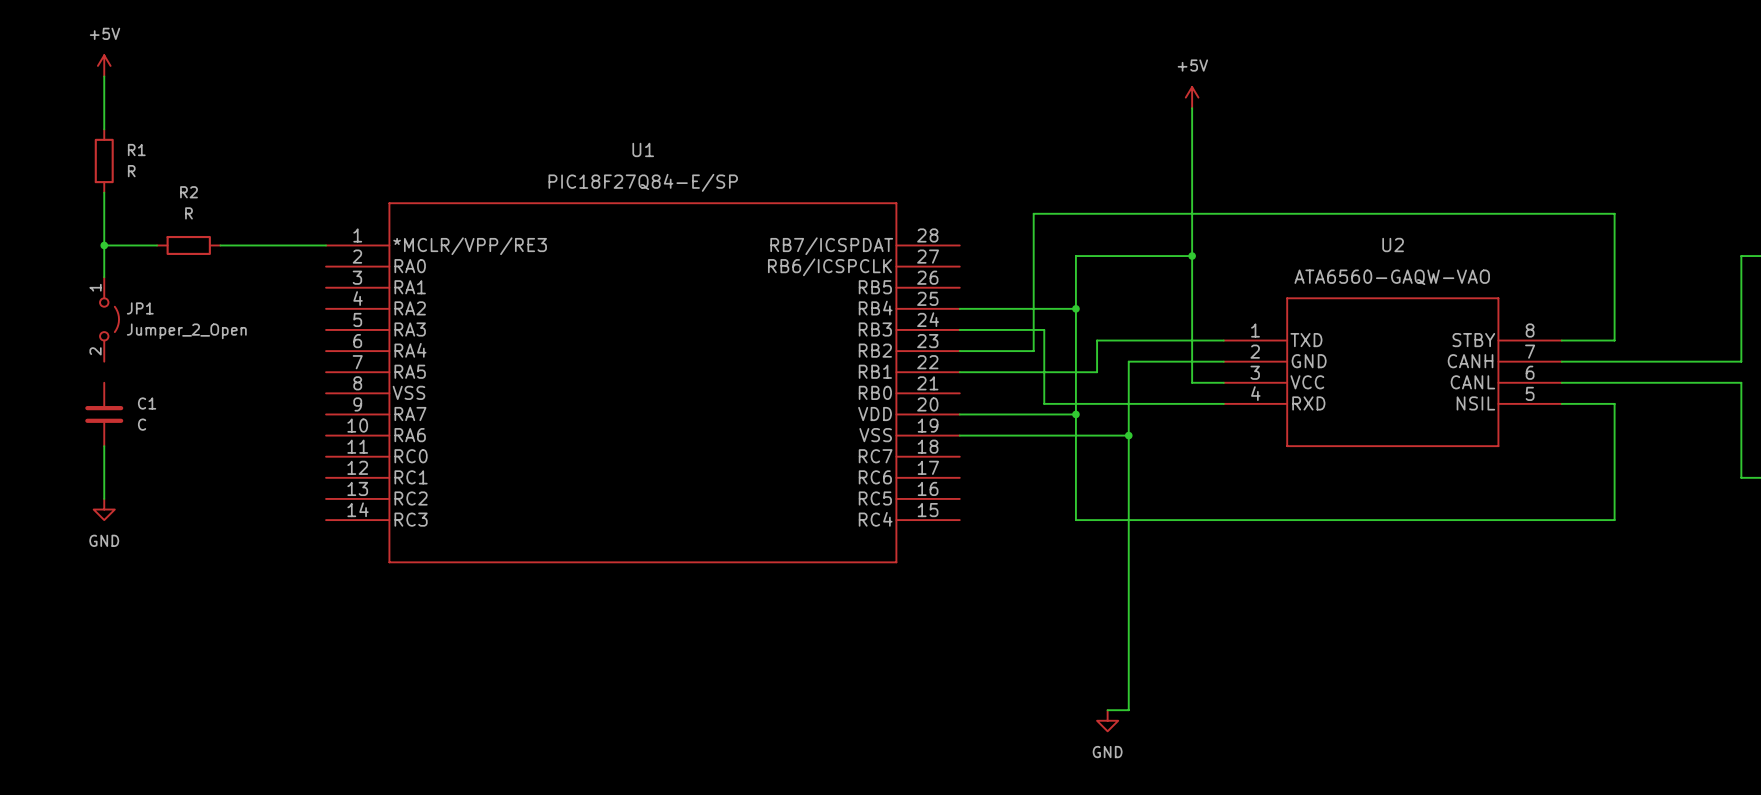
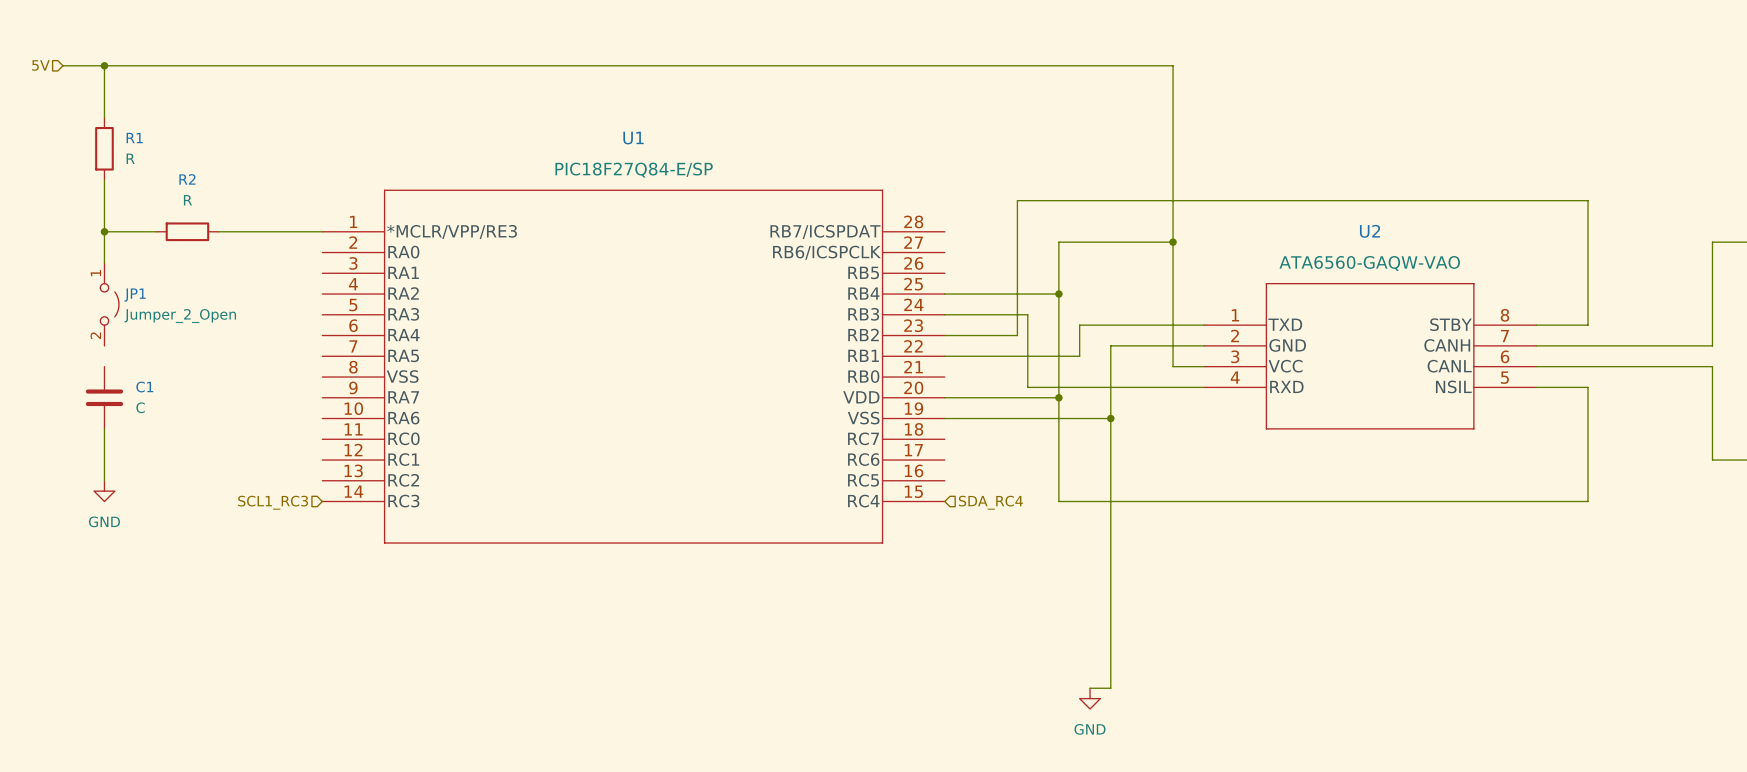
power symbol: +5V (104, 65) -> none
hierarchical label: none -> 5V (40, 65)
wire: none -> (62, 65) (1173, 65) (1173, 96)
junction: none -> (104, 65)
power symbol: +5V (1192, 97) -> none
hierarchical label: none -> SDA_RC4 (990, 502)
hierarchical label: none -> SCL1_RC3 (273, 502)

